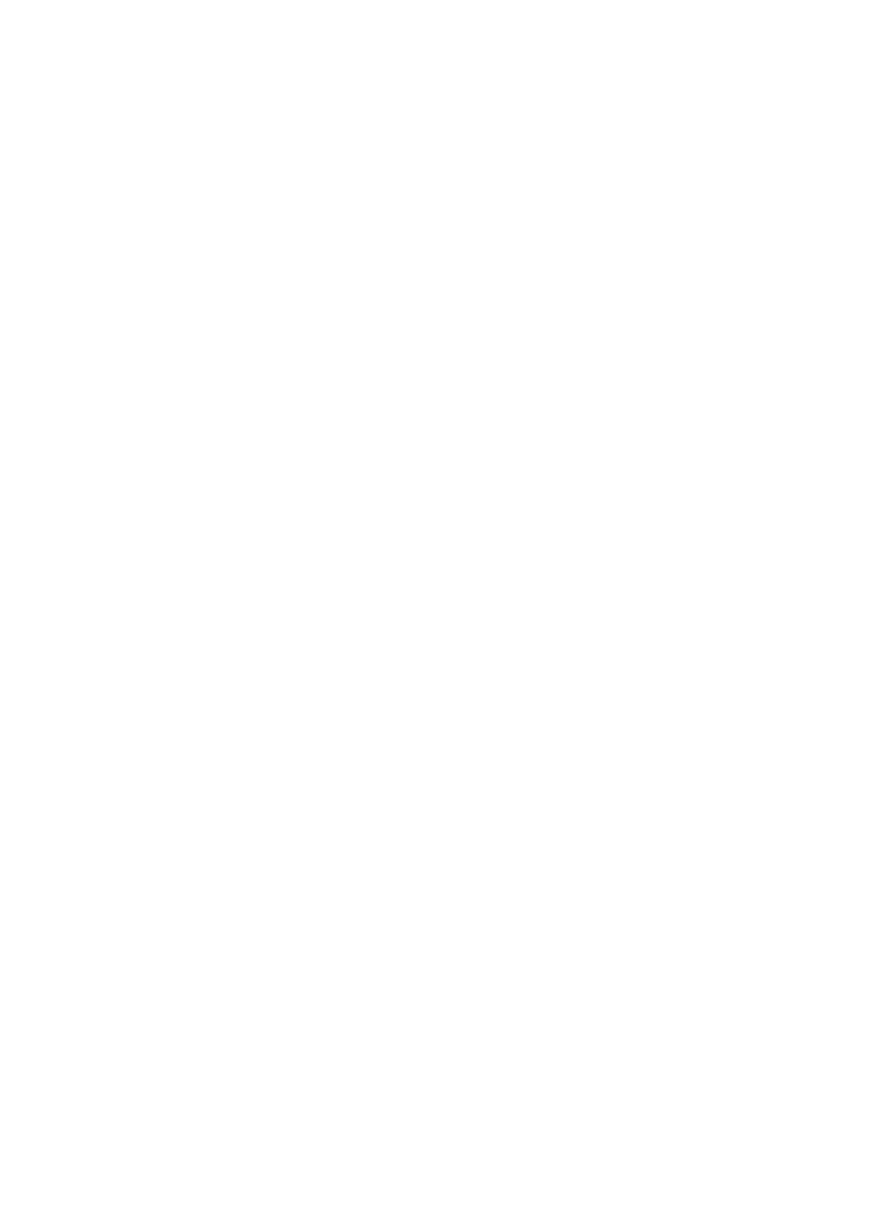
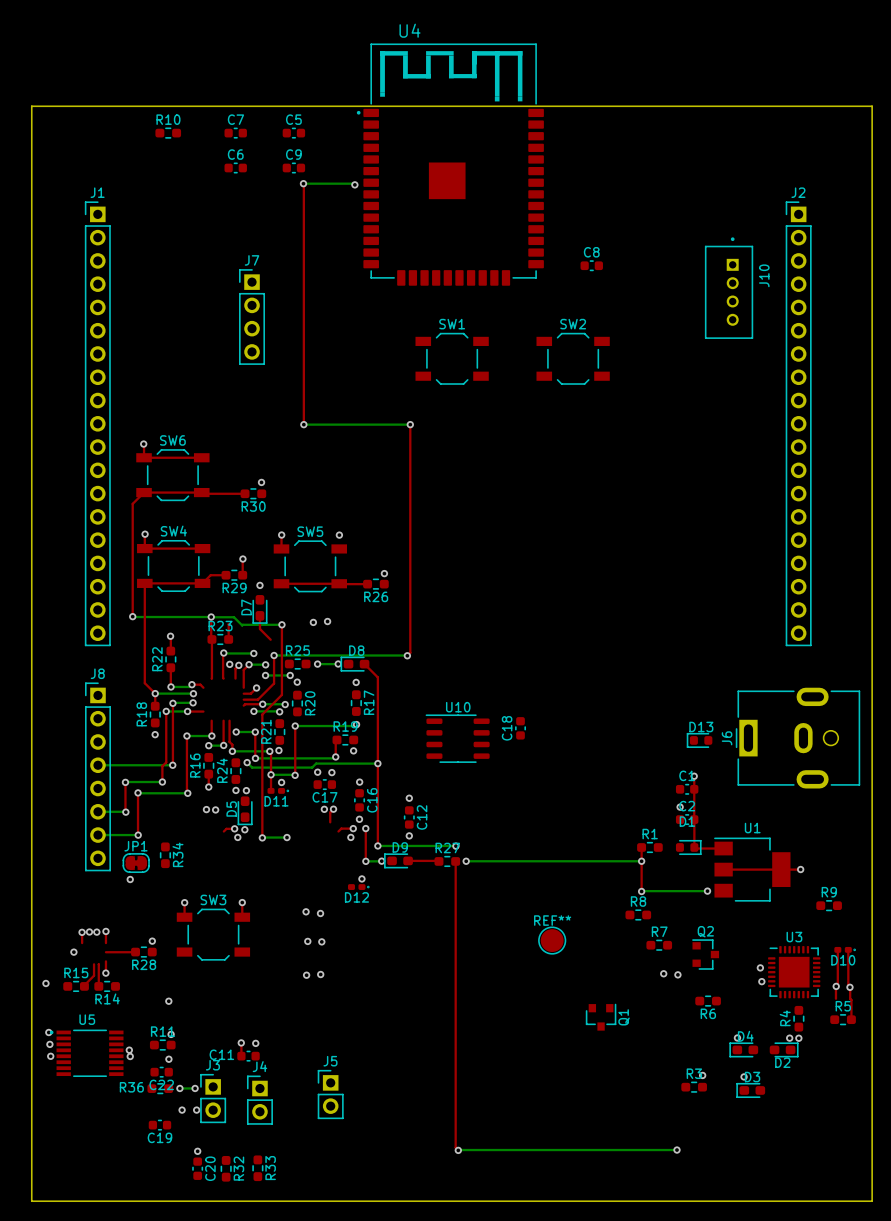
board edge: none -> (31, 106) (872, 106) (872, 1201) (31, 1201) (31, 106)
R10: none -> (168, 133)
C7: none -> (235, 133)
C5: none -> (293, 133)
U4: none -> (450, 164)
C6: none -> (235, 167)
C9: none -> (293, 167)
top track: none -> (303, 183) (303, 424)
bottom track: none -> (303, 183) (354, 184)
via: none -> (303, 183)
via: none -> (354, 184)
C8: none -> (591, 265)
J10: none -> (729, 288)
J7: none -> (252, 317)
SW1: none -> (452, 358)
SW2: none -> (573, 358)
J1: none -> (97, 423)
J2: none -> (798, 423)
bottom track: none -> (303, 424) (410, 424)
via: none -> (303, 424)
top track: none -> (410, 424) (410, 652) (407, 655)
via: none -> (410, 424)
top track: none -> (143, 444) (144, 457) (201, 457)
via: none -> (143, 444)
SW6: none -> (172, 475)
via: none -> (261, 482)
top track: none -> (245, 493) (144, 492) (132, 503) (132, 616)
R30: none -> (253, 493)
top track: none -> (145, 534) (144, 548) (202, 548)
via: none -> (145, 534)
top track: none -> (281, 535) (281, 548)
via: none -> (281, 535)
via: none -> (339, 535)
top track: none -> (242, 559) (242, 575)
via: none -> (242, 559)
SW4: none -> (173, 565)
SW5: none -> (310, 566)
via: none -> (384, 573)
top track: none -> (225, 575) (210, 575) (202, 583) (144, 583) (144, 683) (155, 693) (155, 706)
R29: none -> (234, 575)
top track: none -> (281, 583) (367, 584)
R26: none -> (375, 584)
via: none -> (259, 585)
D7: none -> (259, 609)
top track: none -> (259, 615) (259, 629) (270, 639)
bottom track: none -> (132, 616) (234, 617) (242, 625) (281, 624)
via: none -> (132, 616)
top track: none -> (211, 617) (211, 678)
via: none -> (211, 617)
via: none -> (327, 621)
via: none -> (313, 622)
top track: none -> (228, 623) (228, 639)
top track: none -> (281, 624) (281, 694) (262, 714) (262, 837)
via: none -> (281, 624)
top track: none -> (170, 636) (170, 651)
via: none -> (170, 636)
R23: none -> (220, 639)
top track: none -> (223, 653) (223, 678)
bottom track: none -> (223, 653) (253, 653)
via: none -> (223, 653)
via: none -> (253, 653)
top track: none -> (274, 655) (274, 683) (257, 699) (243, 699)
bottom track: none -> (274, 655) (407, 655)
via: none -> (274, 655)
via: none -> (407, 655)
R22: none -> (170, 659)
via: none -> (229, 664)
top track: none -> (249, 664) (243, 669) (243, 687)
bottom track: none -> (249, 664) (265, 664)
via: none -> (249, 664)
via: none -> (265, 664)
R25: none -> (297, 664)
bottom track: none -> (317, 664) (338, 664)
via: none -> (317, 664)
via: none -> (338, 664)
D8: none -> (355, 664)
top track: none -> (364, 664) (377, 677) (377, 845)
top track: none -> (238, 665) (235, 668) (235, 678)
via: none -> (238, 665)
top track: none -> (170, 667) (171, 686)
bottom track: none -> (265, 675) (290, 675)
via: none -> (265, 675)
via: none -> (290, 675)
via: none -> (297, 682)
via: none -> (356, 682)
top track: none -> (191, 684) (200, 684) (203, 687)
bottom track: none -> (191, 684) (189, 686) (171, 686)
via: none -> (191, 684)
via: none -> (171, 686)
top track: none -> (256, 688) (250, 693) (243, 693)
via: none -> (256, 688)
bottom track: none -> (155, 693) (193, 693)
via: none -> (155, 693)
via: none -> (193, 693)
bottom track: none -> (193, 702) (172, 703)
via: none -> (193, 702)
top track: none -> (172, 703) (172, 765)
via: none -> (172, 703)
R20: none -> (297, 703)
R17: none -> (356, 703)
top track: none -> (262, 704) (243, 705)
bottom track: none -> (262, 704) (285, 704)
via: none -> (262, 704)
via: none -> (285, 704)
top track: none -> (166, 711) (166, 762) (162, 766) (162, 782)
bottom track: none -> (166, 711) (187, 711)
via: none -> (166, 711)
top track: none -> (187, 711) (203, 711)
via: none -> (187, 711)
bottom track: none -> (253, 711) (279, 711)
via: none -> (253, 711)
via: none -> (279, 711)
R18: none -> (155, 714)
top track: none -> (211, 720) (211, 736)
top track: none -> (223, 720) (223, 745)
top track: none -> (229, 720) (229, 741) (232, 744) (232, 751)
bottom track: none -> (356, 724) (295, 726)
via: none -> (356, 724)
top track: none -> (295, 726) (295, 775)
via: none -> (295, 726)
C18: none -> (520, 728)
bottom track: none -> (236, 731) (255, 731)
via: none -> (236, 731)
R21: none -> (279, 731)
top track: none -> (255, 732) (255, 758)
via: none -> (255, 732)
via: none -> (155, 734)
top track: none -> (186, 736) (187, 793)
bottom track: none -> (186, 736) (211, 736)
via: none -> (186, 736)
via: none -> (211, 736)
U10: none -> (457, 738)
J6: none -> (797, 738)
top track: none -> (336, 739) (335, 756)
R19: none -> (345, 739)
D13: none -> (699, 740)
via: none -> (208, 745)
bottom track: none -> (223, 745) (208, 745)
via: none -> (223, 745)
via: none -> (278, 750)
via: none -> (353, 750)
bottom track: none -> (232, 751) (269, 751)
via: none -> (232, 751)
top track: none -> (269, 751) (271, 790)
via: none -> (269, 751)
bottom track: none -> (335, 756) (255, 758)
via: none -> (335, 756)
via: none -> (255, 758)
bottom track: none -> (247, 762) (252, 767) (312, 767) (316, 763) (377, 763)
via: none -> (247, 762)
via: none -> (377, 763)
bottom track: none -> (97, 765) (172, 765)
via: none -> (172, 765)
R16: none -> (208, 765)
R24: none -> (235, 771)
via: none -> (317, 772)
via: none -> (331, 772)
top track: none -> (208, 774) (208, 787)
bottom track: none -> (271, 774) (295, 775)
via: none -> (271, 774)
via: none -> (295, 775)
J8: none -> (97, 776)
top track: none -> (694, 776) (694, 819)
via: none -> (694, 776)
top track: none -> (125, 782) (125, 812)
via: none -> (125, 782)
bottom track: none -> (162, 782) (125, 782)
via: none -> (162, 782)
via: none -> (281, 782)
via: none -> (359, 782)
C17: none -> (324, 784)
via: none -> (208, 787)
C1: none -> (687, 789)
via: none -> (235, 790)
via: none -> (246, 790)
D11: none -> (278, 790)
top track: none -> (138, 792) (138, 835)
bottom track: none -> (138, 792) (187, 793)
via: none -> (138, 792)
via: none -> (187, 793)
via: none -> (409, 798)
C16: none -> (359, 800)
via: none -> (680, 807)
via: none -> (206, 809)
via: none -> (215, 809)
via: none -> (324, 809)
top track: none -> (333, 809) (330, 812) (330, 822)
via: none -> (333, 809)
D5: none -> (245, 810)
bottom track: none -> (97, 811) (125, 812)
via: none -> (125, 812)
C12: none -> (409, 817)
via: none -> (359, 819)
C2: none -> (687, 819)
top track: none -> (694, 819) (695, 848) (723, 848)
top track: none -> (234, 828) (226, 828) (223, 831)
via: none -> (234, 828)
top track: none -> (353, 828) (341, 828) (338, 831)
via: none -> (353, 828)
top track: none -> (365, 828) (365, 861)
via: none -> (365, 828)
via: none -> (244, 829)
bottom track: none -> (97, 835) (138, 835)
via: none -> (138, 835)
via: none -> (409, 835)
via: none -> (237, 837)
via: none -> (262, 837)
bottom track: none -> (286, 837) (262, 837)
via: none -> (286, 837)
via: none -> (350, 837)
bottom track: none -> (377, 845) (455, 846)
via: none -> (377, 845)
via: none -> (455, 846)
top track: none -> (641, 847) (641, 891)
R1: none -> (649, 847)
D1: none -> (688, 847)
R34: none -> (165, 855)
D9: none -> (398, 860)
top track: none -> (408, 860) (438, 861)
via: none -> (365, 861)
bottom track: none -> (381, 861) (365, 861)
via: none -> (381, 861)
R27: none -> (447, 861)
top track: none -> (455, 861) (455, 1147) (458, 1150)
bottom track: none -> (466, 861) (641, 861)
via: none -> (466, 861)
via: none -> (641, 861)
JP1: none -> (136, 863)
top track: none -> (723, 869) (800, 869)
U1: none -> (752, 869)
via: none -> (800, 869)
via: none -> (361, 878)
via: none -> (130, 879)
D12: none -> (358, 887)
via: none -> (641, 891)
bottom track: none -> (707, 891) (641, 891)
via: none -> (707, 891)
top track: none -> (184, 902) (184, 917)
via: none -> (184, 902)
top track: none -> (242, 902) (242, 917)
via: none -> (242, 902)
R9: none -> (829, 905)
via: none -> (306, 911)
via: none -> (320, 913)
R8: none -> (638, 914)
via: none -> (89, 931)
top track: none -> (105, 931) (105, 943)
via: none -> (105, 931)
top track: none -> (82, 932) (82, 943)
via: none -> (82, 932)
via: none -> (96, 932)
SW3: none -> (213, 934)
REF**: none -> (552, 940)
via: none -> (152, 941)
via: none -> (307, 941)
via: none -> (321, 941)
R7: none -> (659, 945)
top track: none -> (837, 949) (835, 998)
D10: none -> (844, 949)
top track: none -> (848, 949) (848, 985) (851, 1000) (851, 1019)
via: none -> (73, 952)
top track: none -> (135, 952) (105, 952)
R28: none -> (143, 952)
Q2: none -> (705, 954)
top track: none -> (105, 961) (105, 973)
top track: none -> (94, 964) (94, 975) (84, 986)
top track: none -> (98, 964) (98, 986)
via: none -> (760, 967)
U3: none -> (794, 972)
via: none -> (105, 973)
via: none -> (663, 973)
via: none -> (320, 974)
via: none -> (677, 974)
via: none -> (306, 975)
via: none -> (761, 981)
via: none -> (45, 983)
R15: none -> (76, 986)
R14: none -> (107, 986)
via: none -> (836, 986)
via: none -> (849, 987)
via: none -> (168, 1001)
R6: none -> (708, 1001)
Q1: none -> (601, 1017)
R4: none -> (798, 1018)
R5: none -> (843, 1019)
via: none -> (48, 1032)
via: none -> (171, 1034)
via: none -> (737, 1037)
via: none -> (789, 1038)
via: none -> (798, 1038)
top track: none -> (241, 1042) (241, 1056)
via: none -> (241, 1042)
via: none -> (255, 1043)
via: none -> (49, 1044)
R11: none -> (162, 1045)
D4: none -> (743, 1049)
D2: none -> (784, 1049)
via: none -> (129, 1050)
U5: none -> (86, 1053)
via: none -> (50, 1056)
via: none -> (130, 1056)
C11: none -> (248, 1056)
via: none -> (168, 1059)
C22: none -> (161, 1072)
via: none -> (702, 1075)
via: none -> (744, 1076)
R3: none -> (694, 1087)
R36: none -> (160, 1088)
bottom track: none -> (179, 1088) (195, 1088)
via: none -> (179, 1088)
via: none -> (195, 1088)
D3: none -> (750, 1090)
J5: none -> (330, 1094)
J3: none -> (213, 1098)
J4: none -> (259, 1100)
via: none -> (182, 1110)
via: none -> (196, 1110)
C19: none -> (159, 1125)
via: none -> (458, 1150)
bottom track: none -> (676, 1150) (458, 1150)
via: none -> (676, 1150)
via: none -> (197, 1151)
C20: none -> (197, 1168)
R32: none -> (226, 1168)
R33: none -> (257, 1168)

